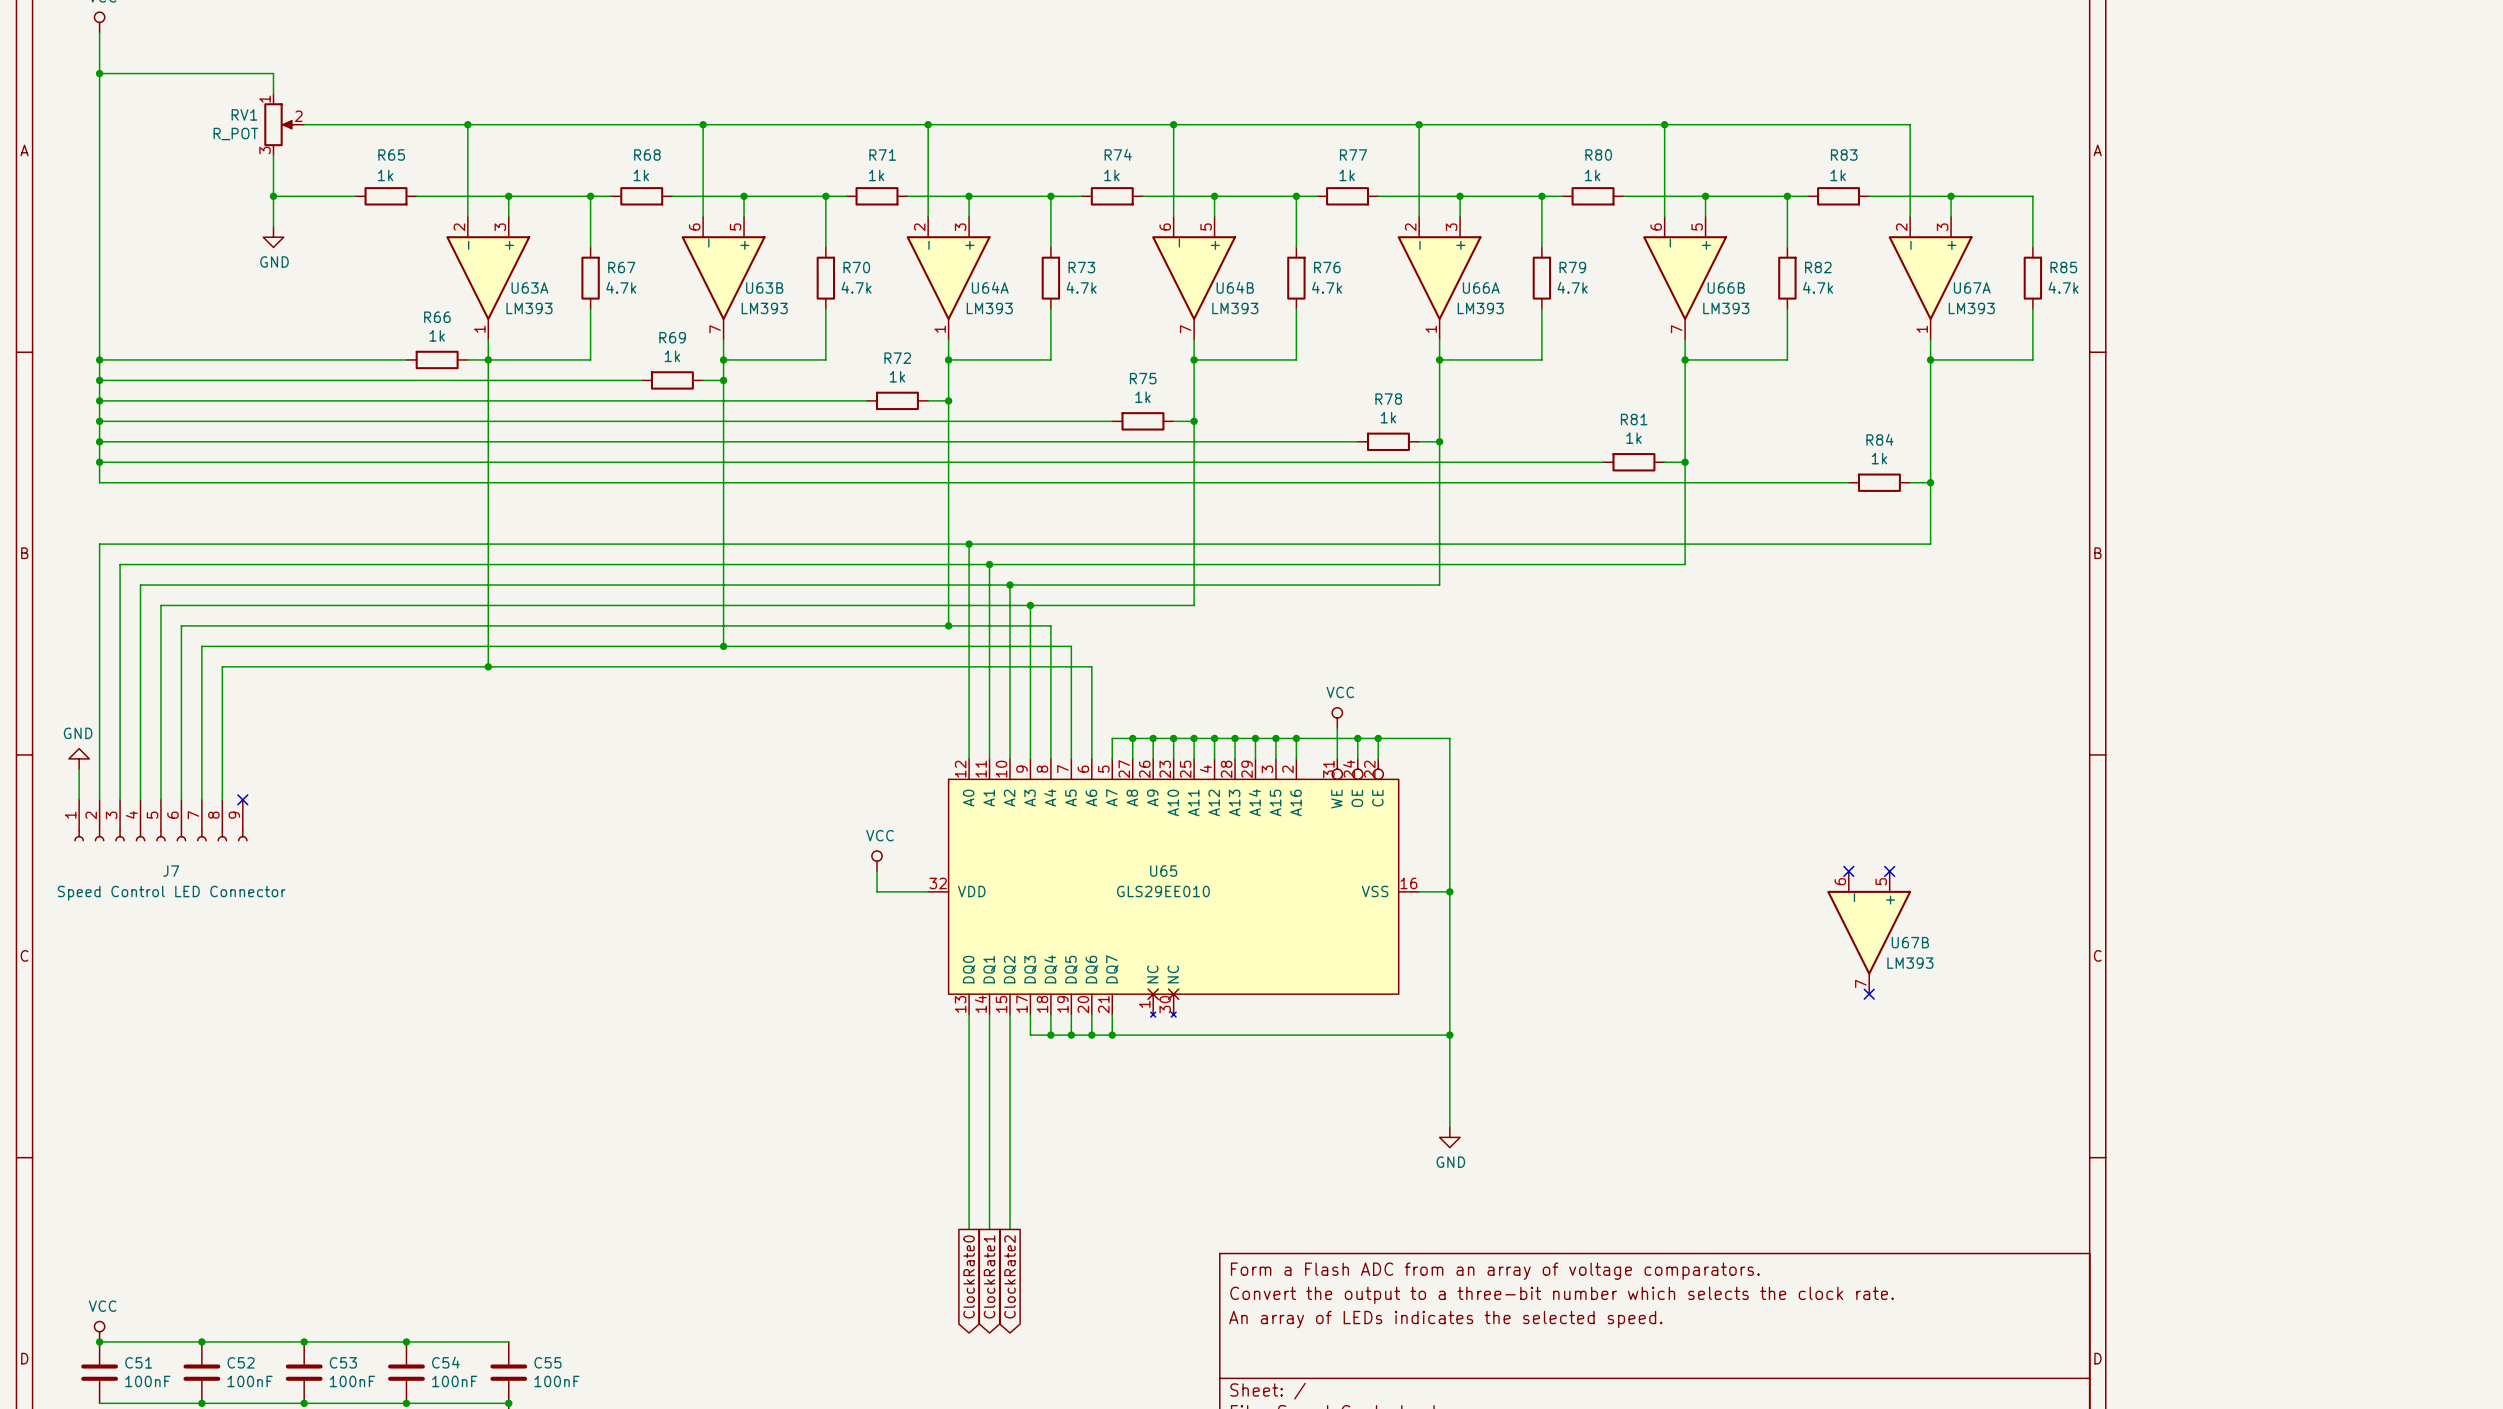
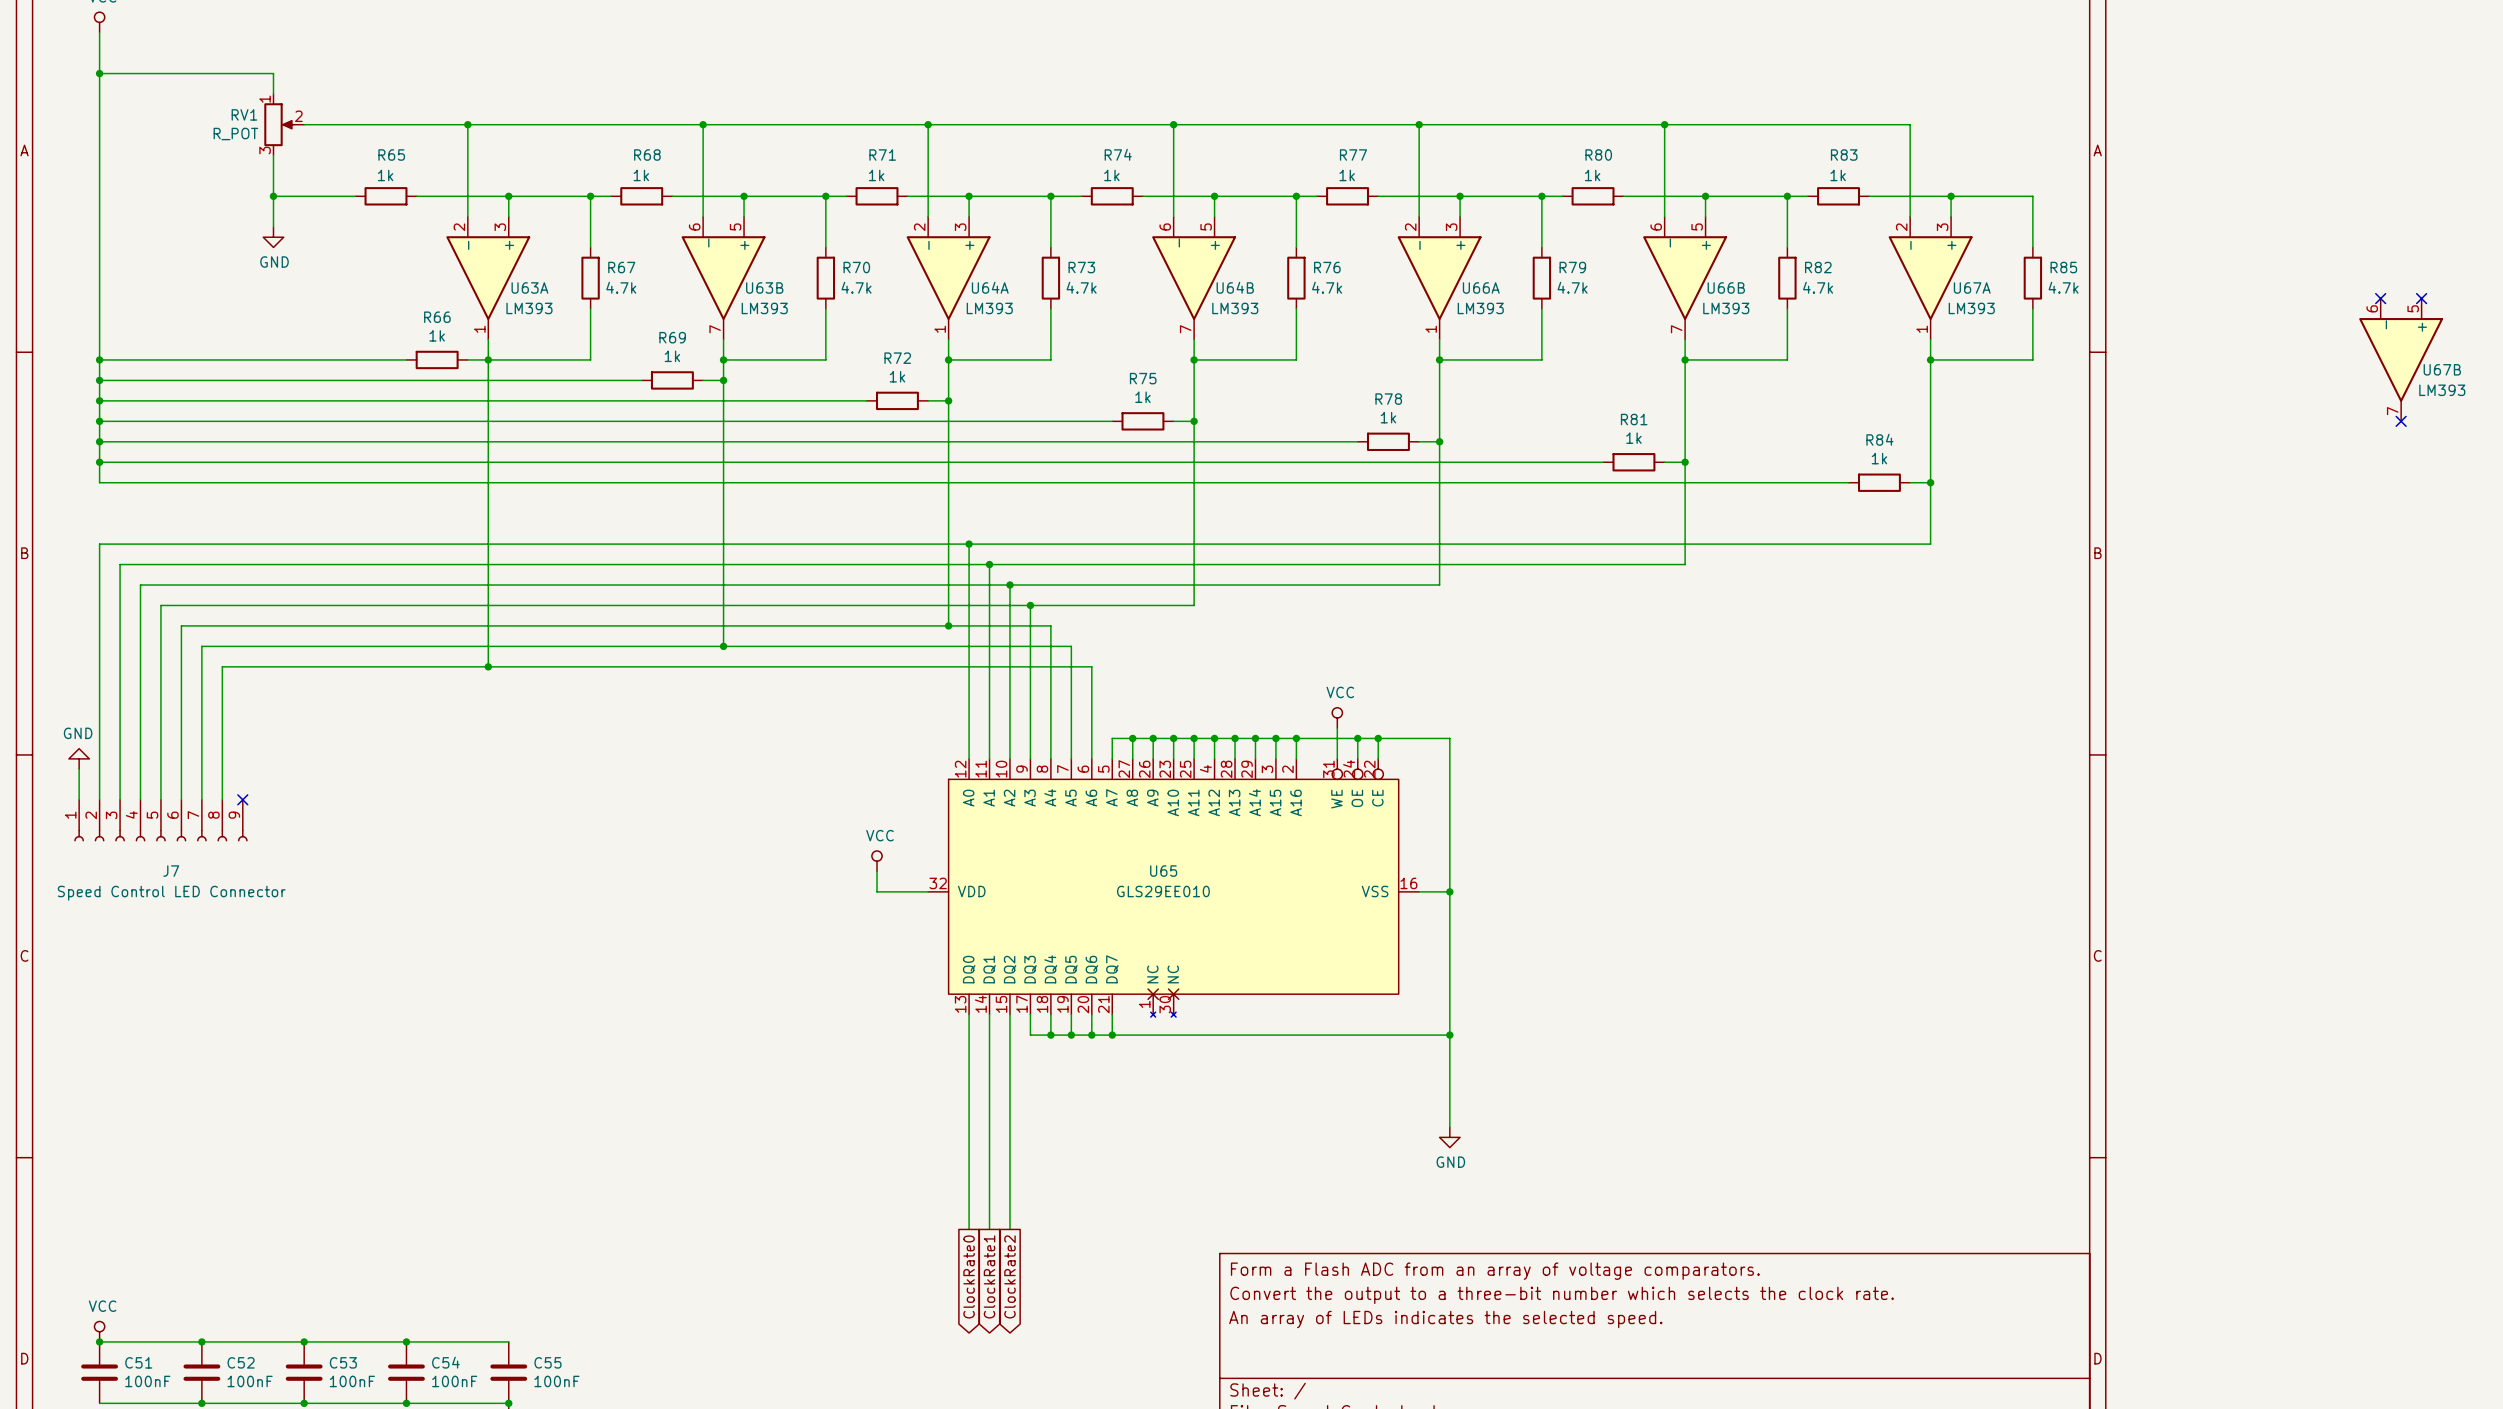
no-connect mark: none -> (2380, 298)
no-connect mark: none -> (2421, 298)
no-connect mark: none -> (2401, 421)
no-connect mark: (1848, 871) -> none
no-connect mark: (1889, 871) -> none
U67B position: (1869, 932) -> (2401, 359)
no-connect mark: (1869, 994) -> none

